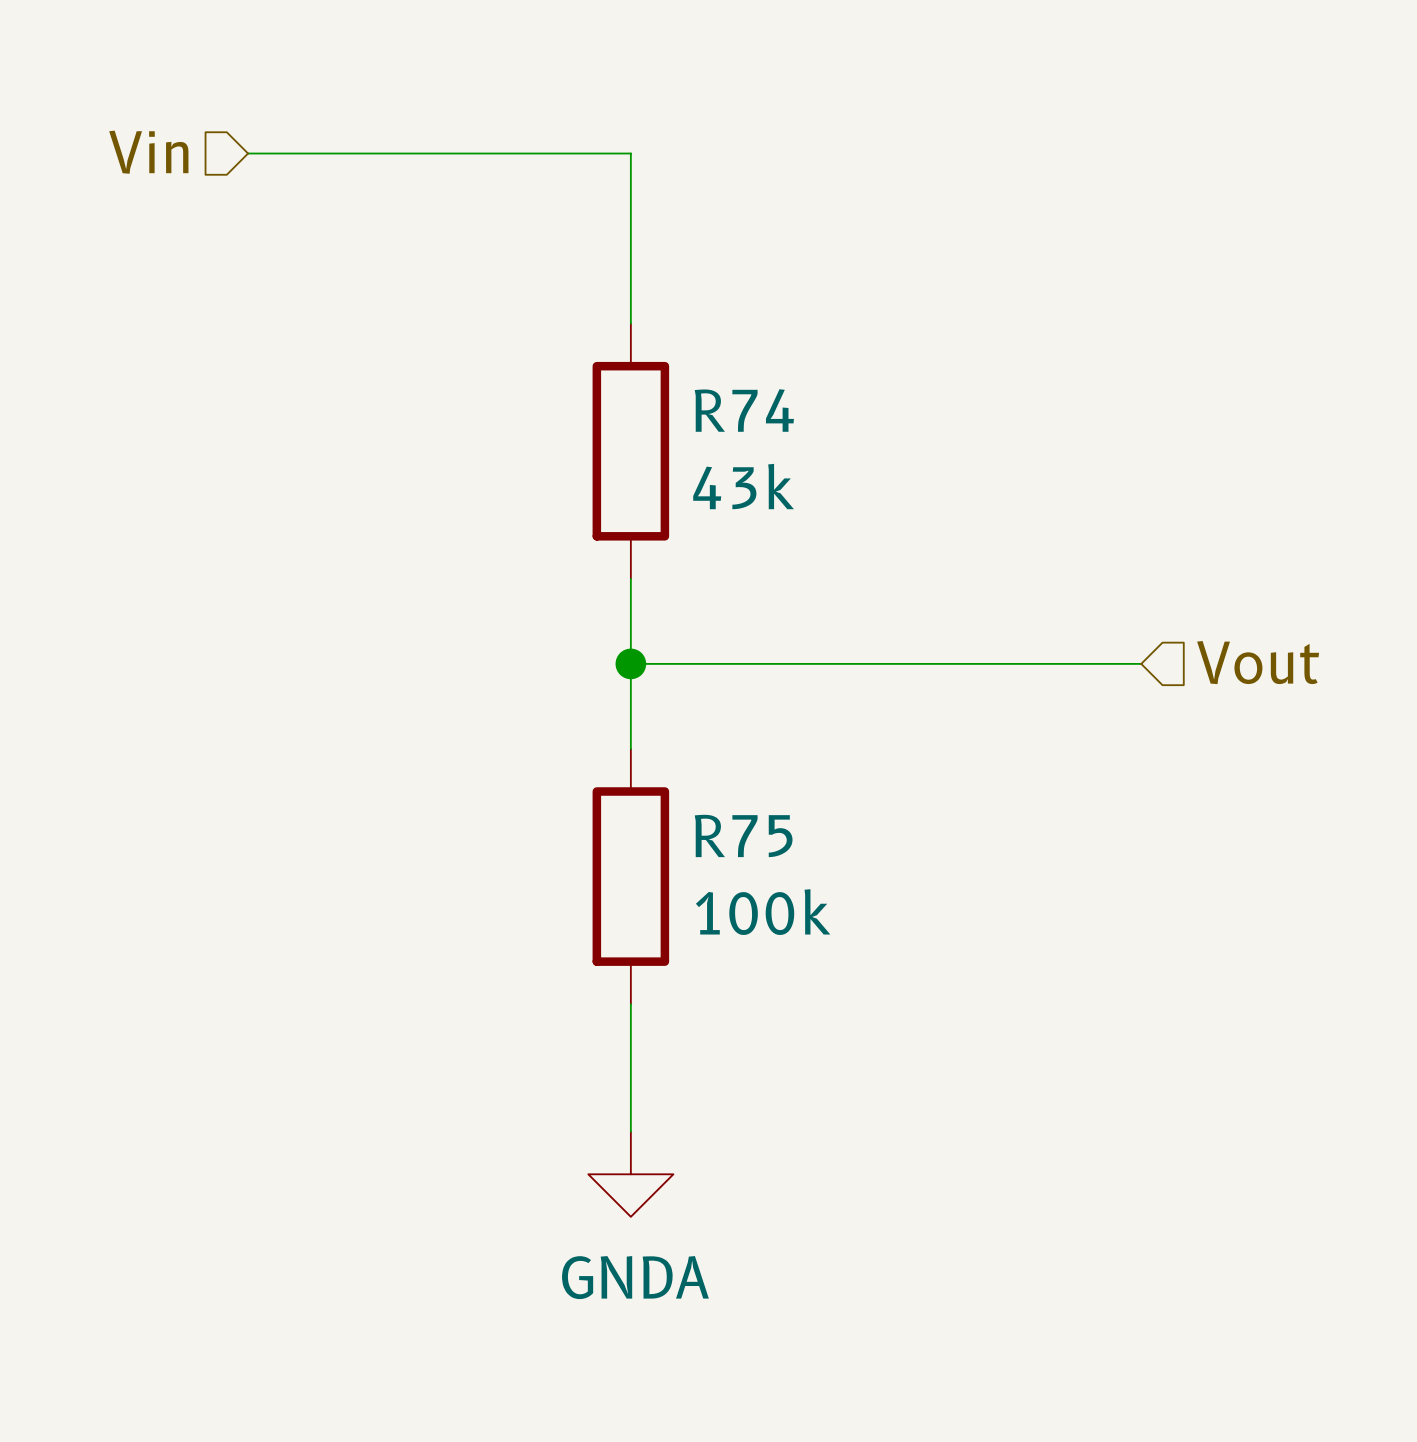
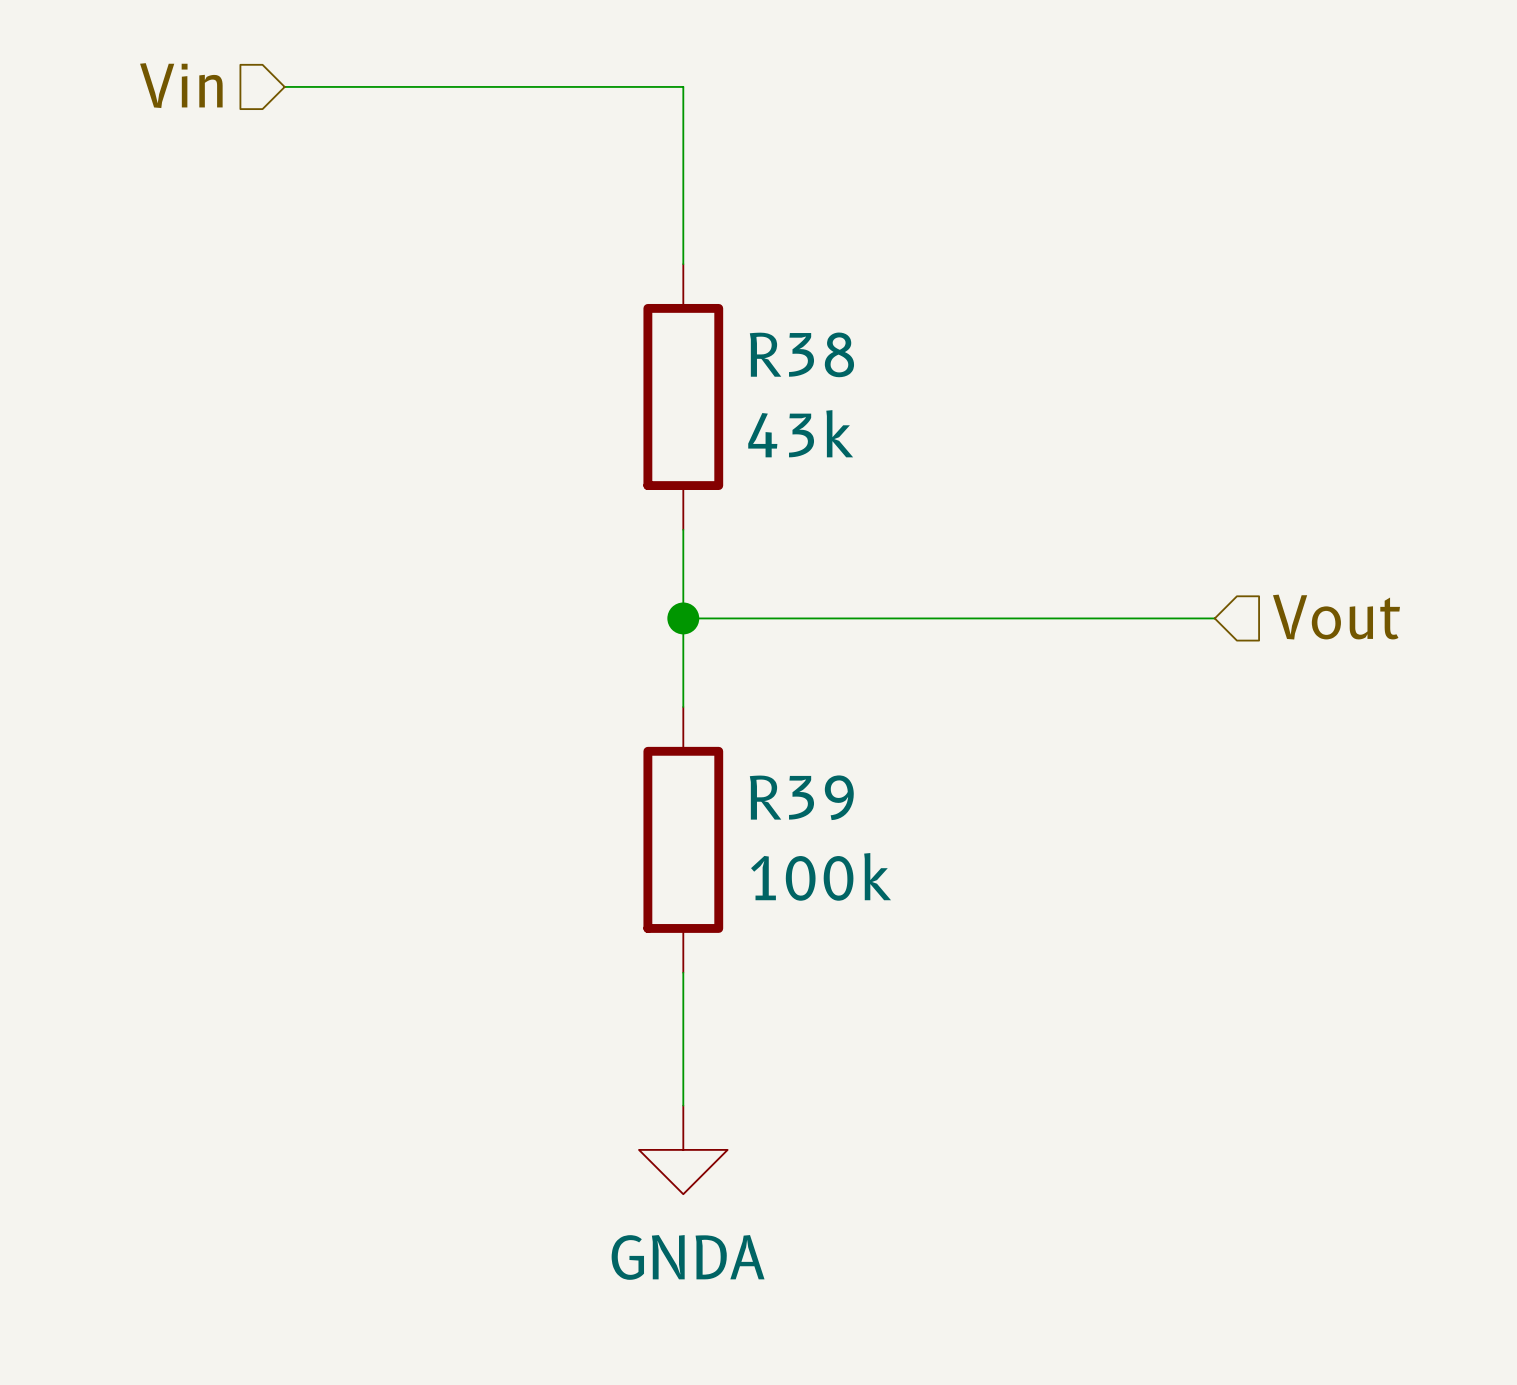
R74 name: R74 (744, 410) -> R38 (801, 354)
R75 name: R75 (743, 835) -> R39 (801, 797)

